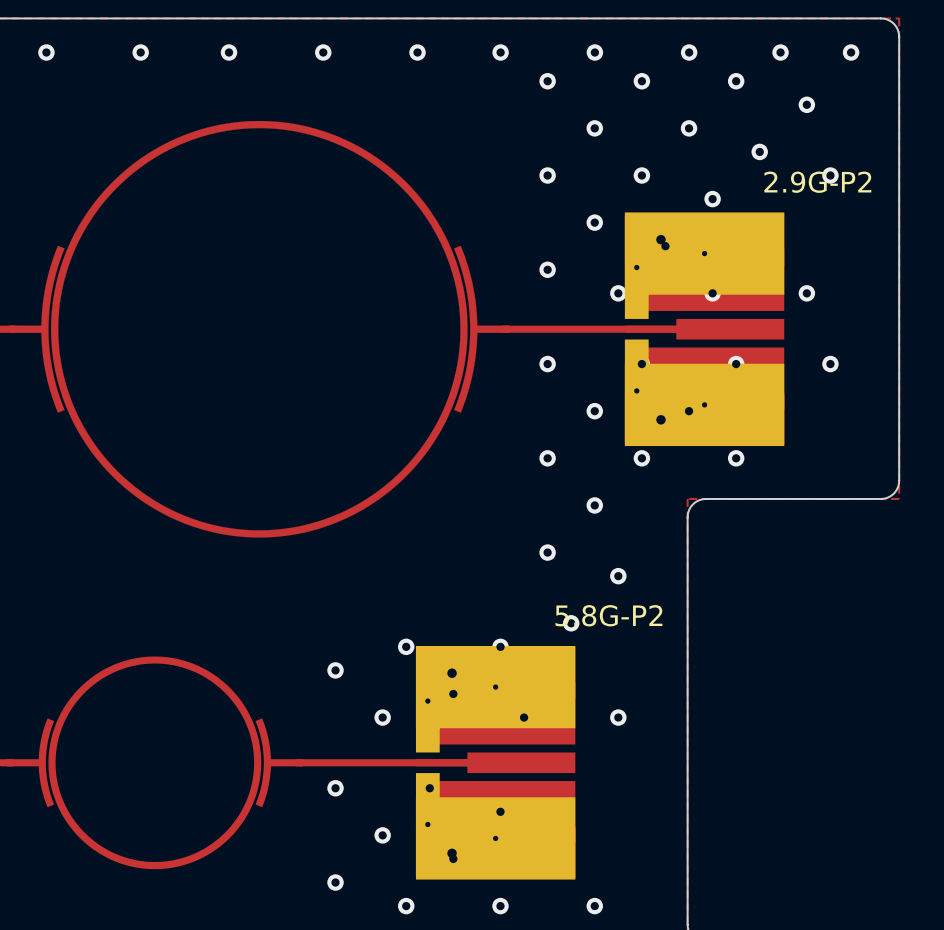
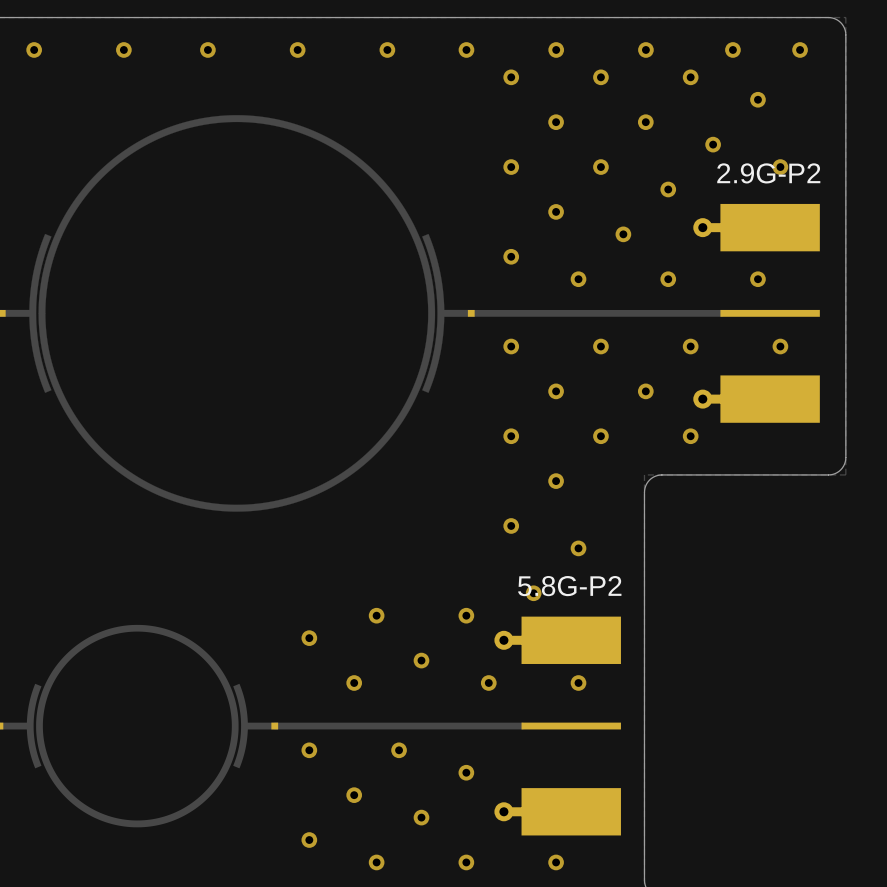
part: 2.9G-P2 (704, 329) -> none
part: none -> 2.9G-P2 (756, 313)
part: 5.8G-P2 (495, 762) -> none
part: none -> 5.8G-P2 (557, 726)

